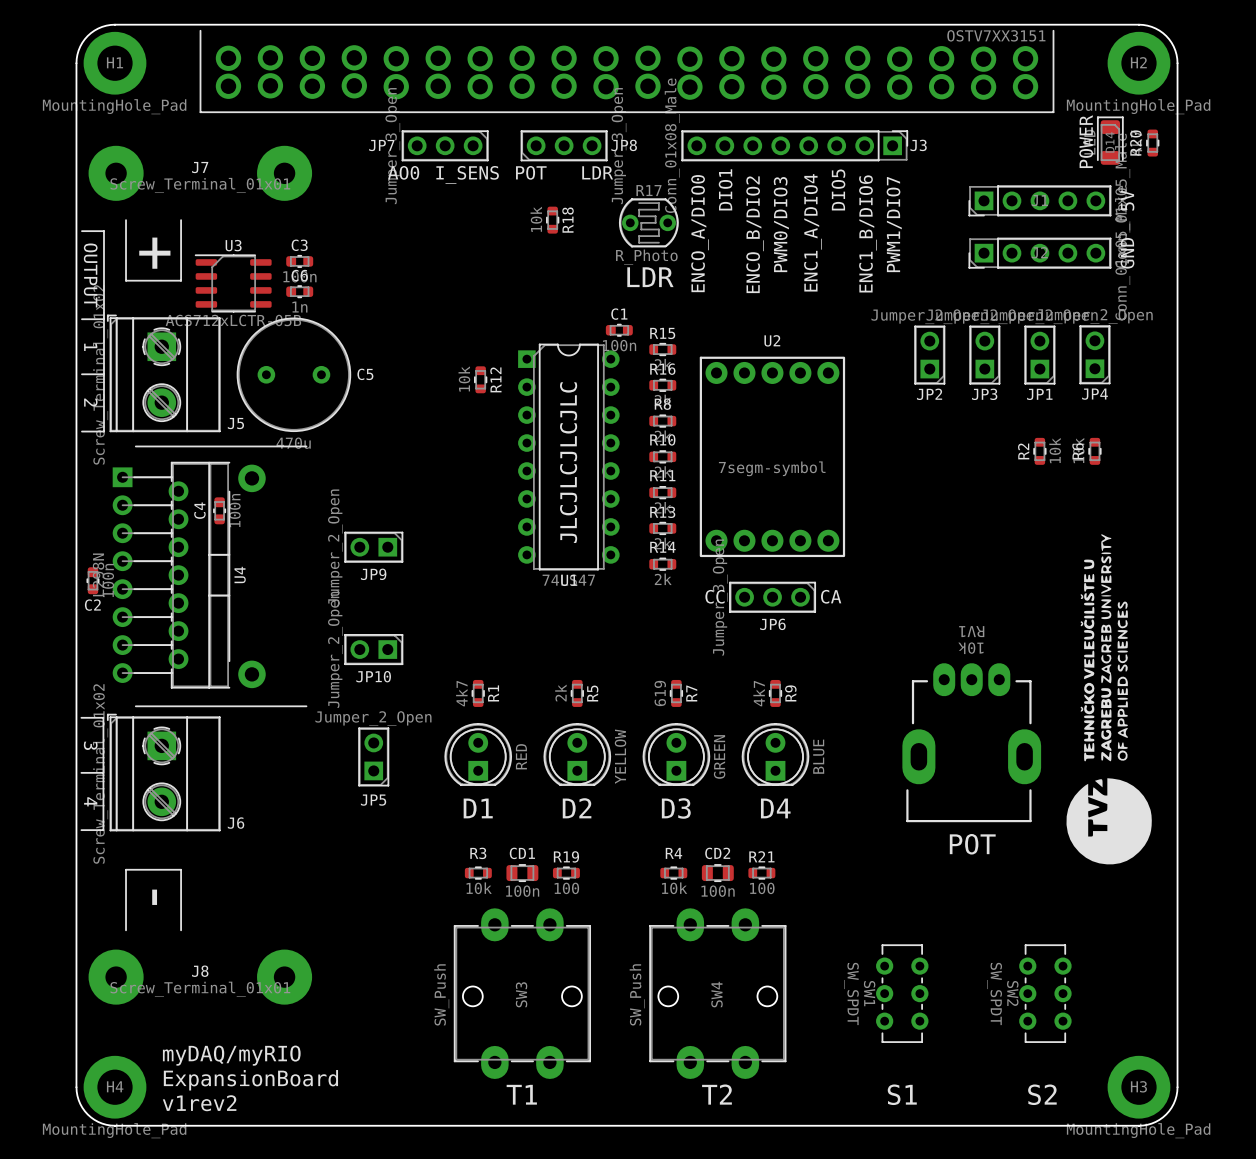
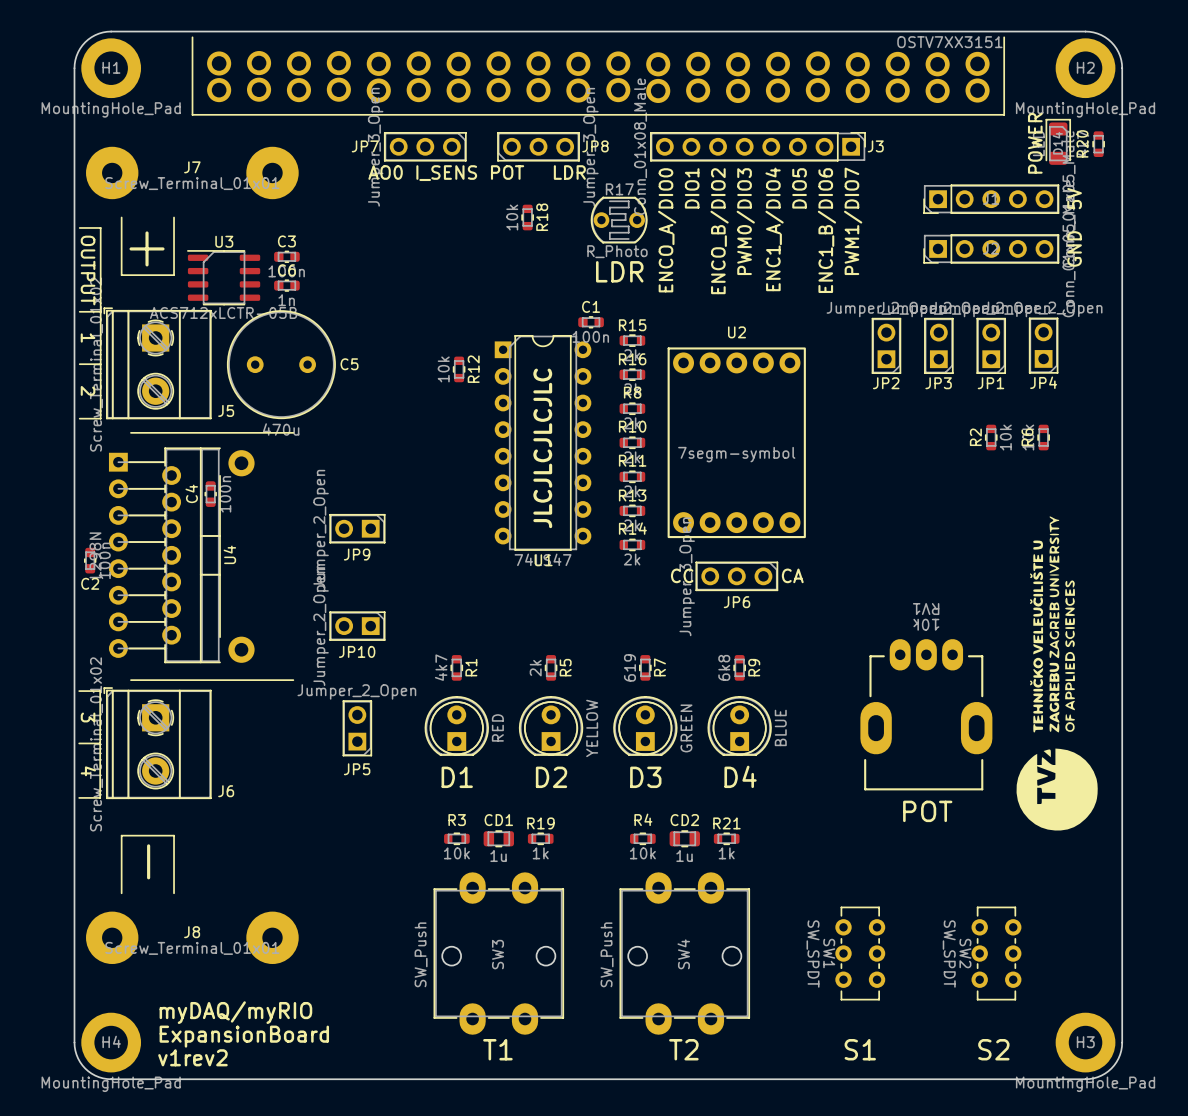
R9 value: 4k7 (759, 693) -> 6k8 (724, 667)
R19 value: 100 (566, 888) -> 1k (540, 853)
R21 value: 100 (762, 888) -> 1k (726, 853)
CD1 value: 100n (522, 891) -> 1u (498, 856)
CD2 value: 100n (718, 891) -> 1u (684, 856)

